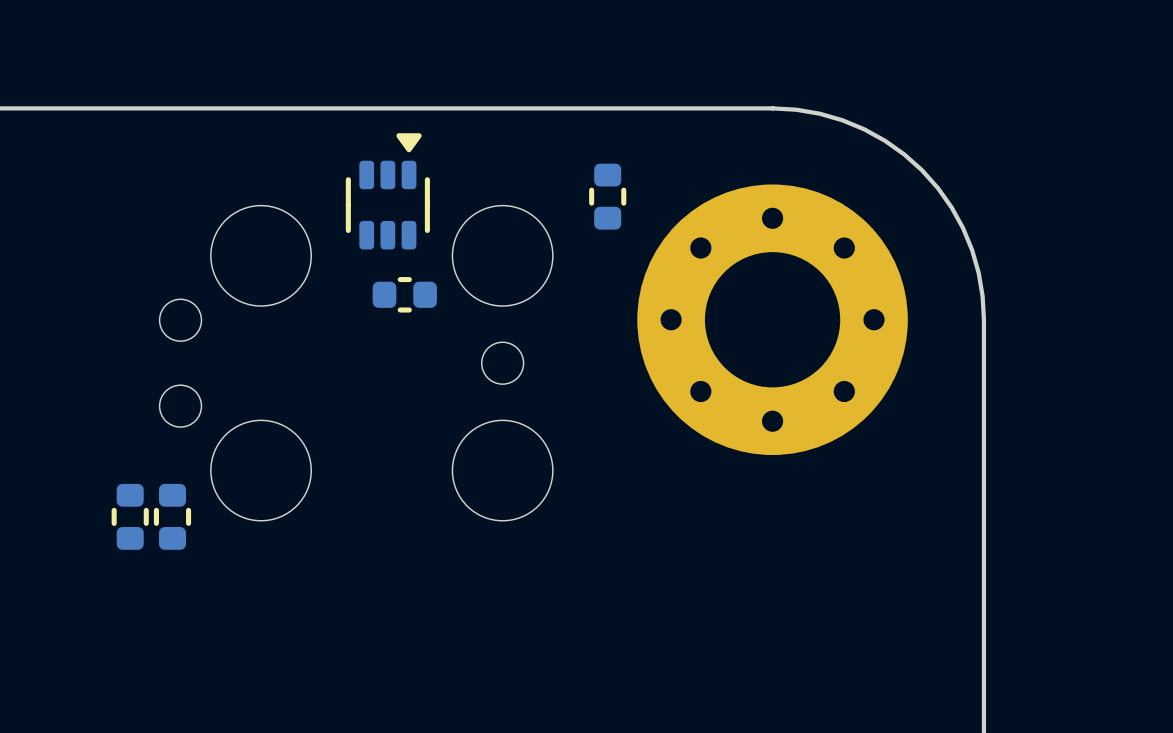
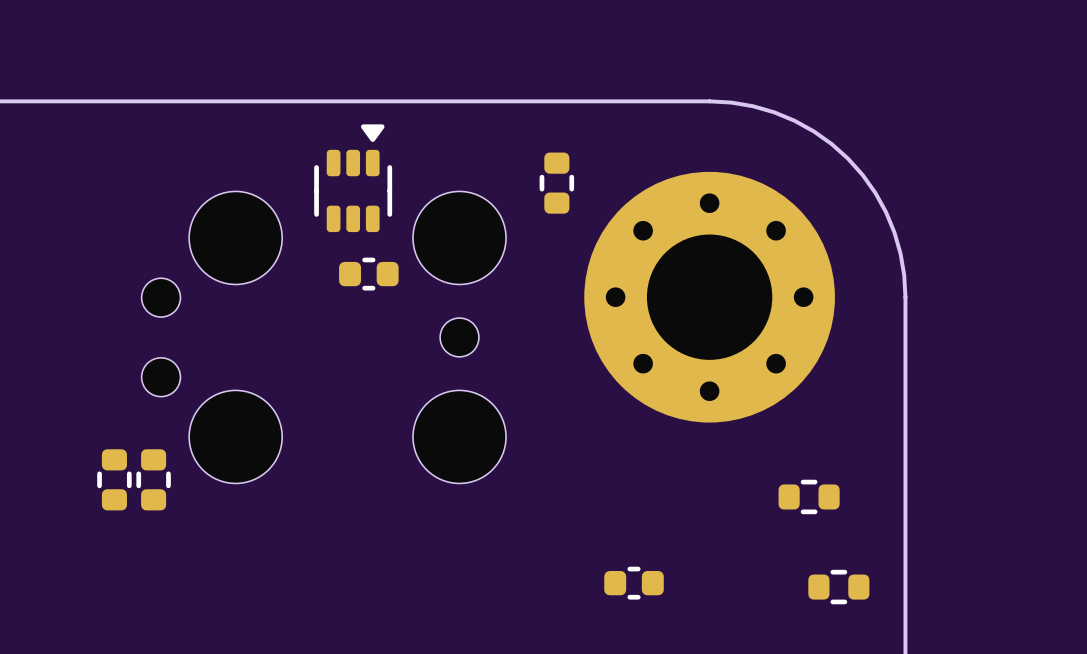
part: none -> (809, 496)
part: none -> (634, 583)
part: none -> (838, 587)

